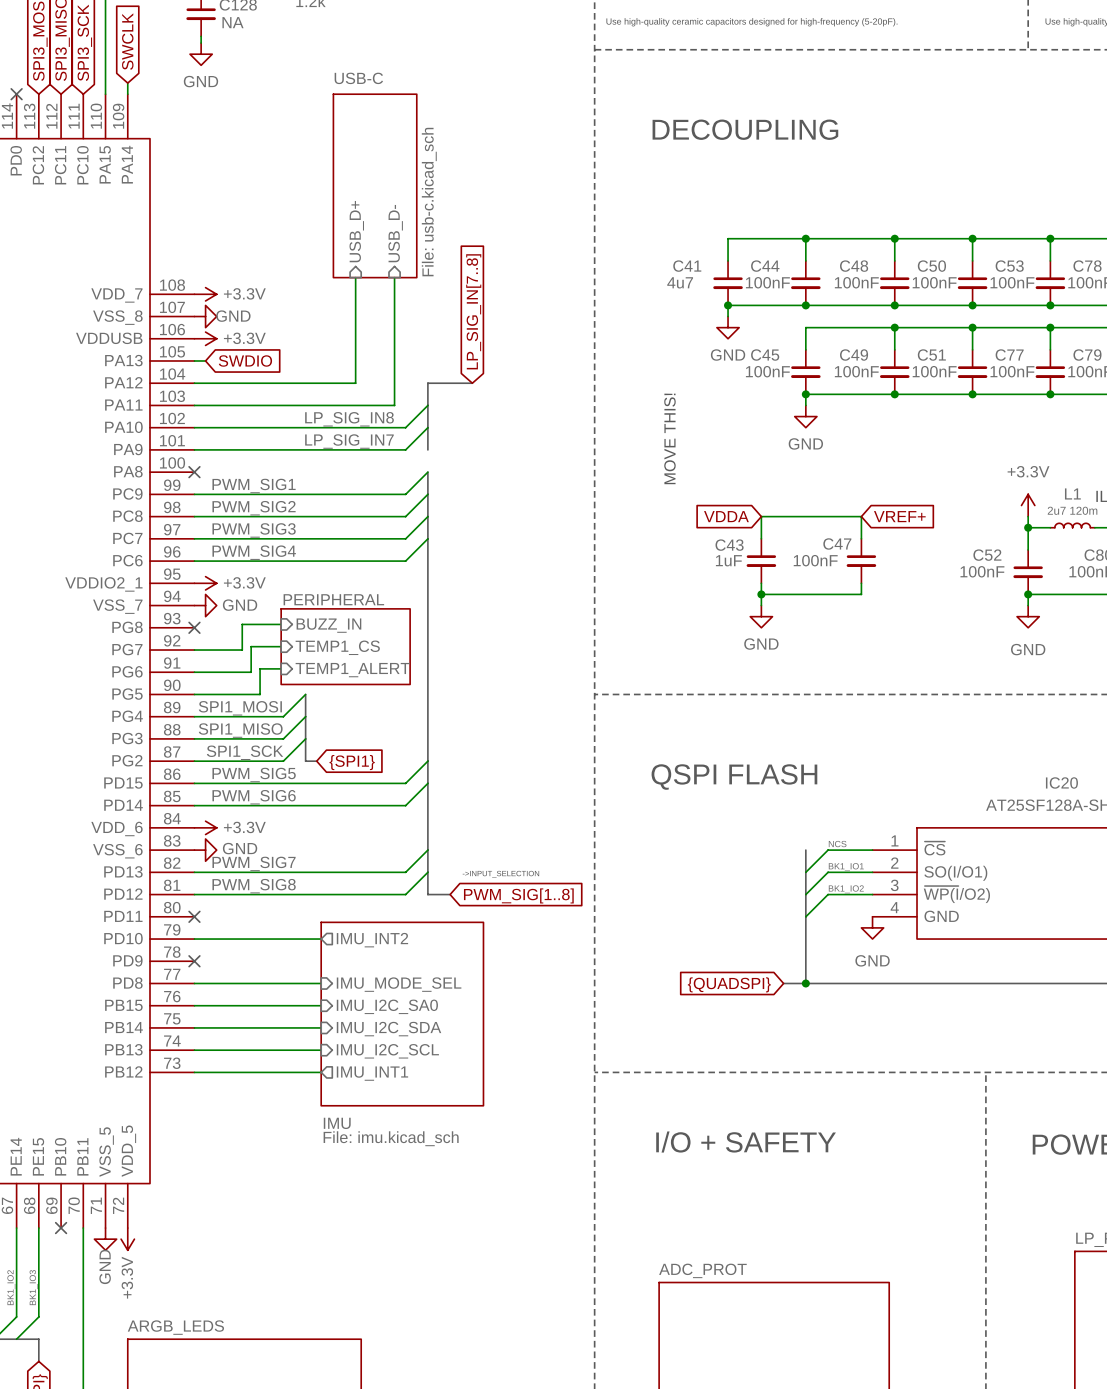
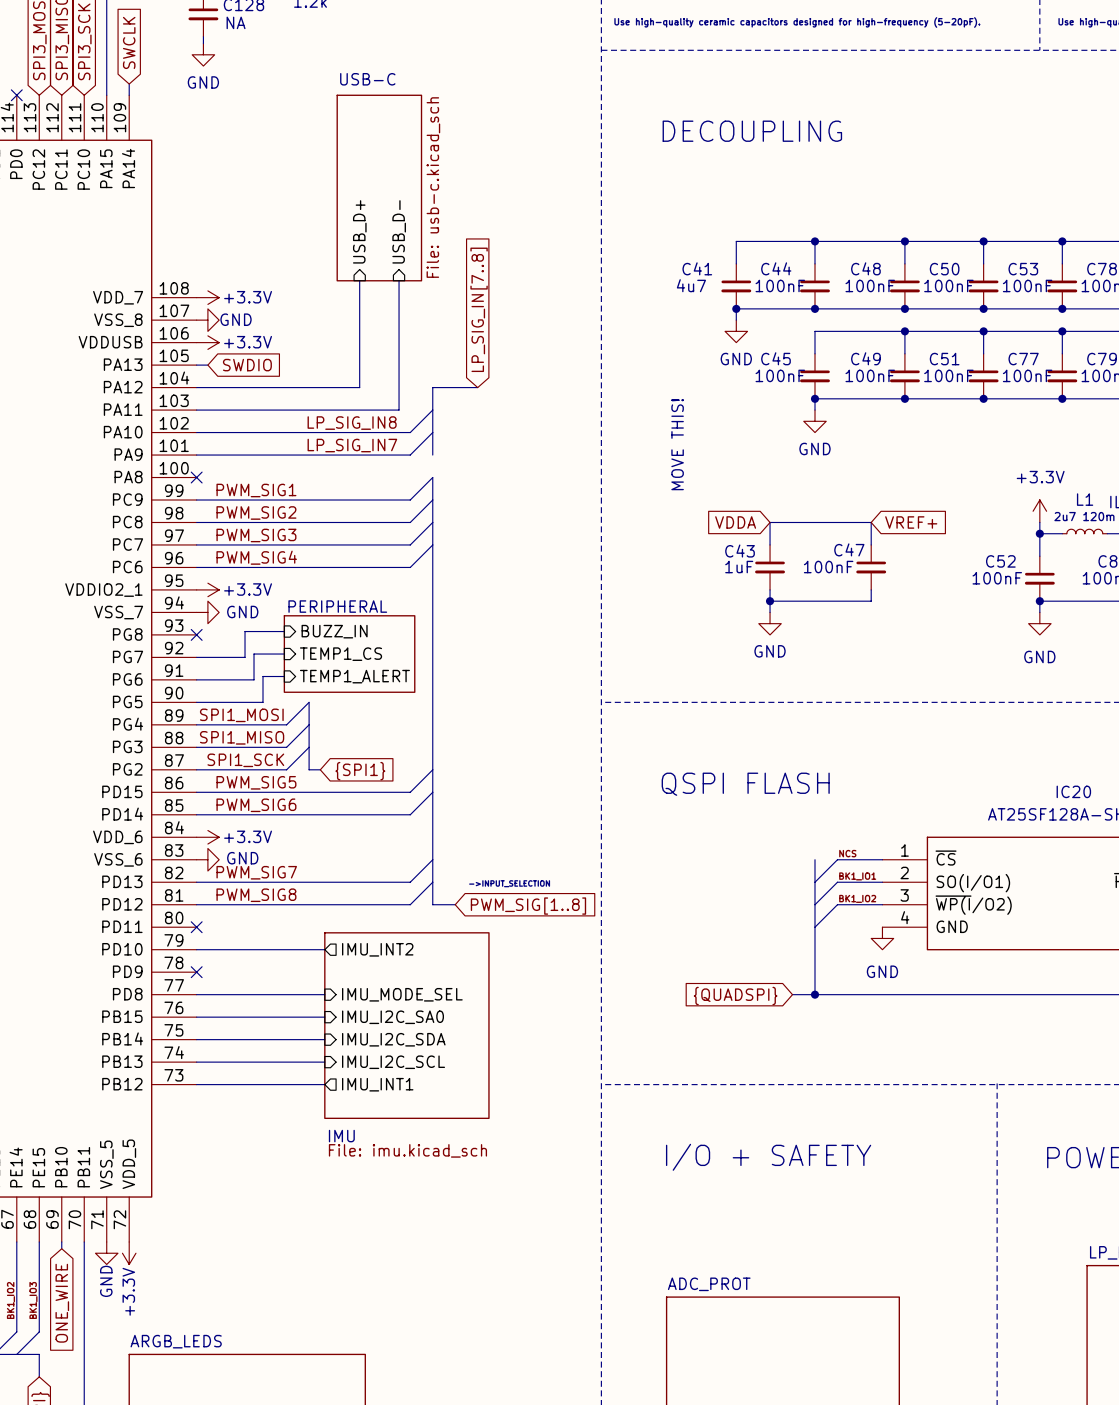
wire: none -> (61, 1241) (61, 1248)
no-connect mark: (61, 1228) -> none
global label: none -> ONE_WIRE (62, 1303)

